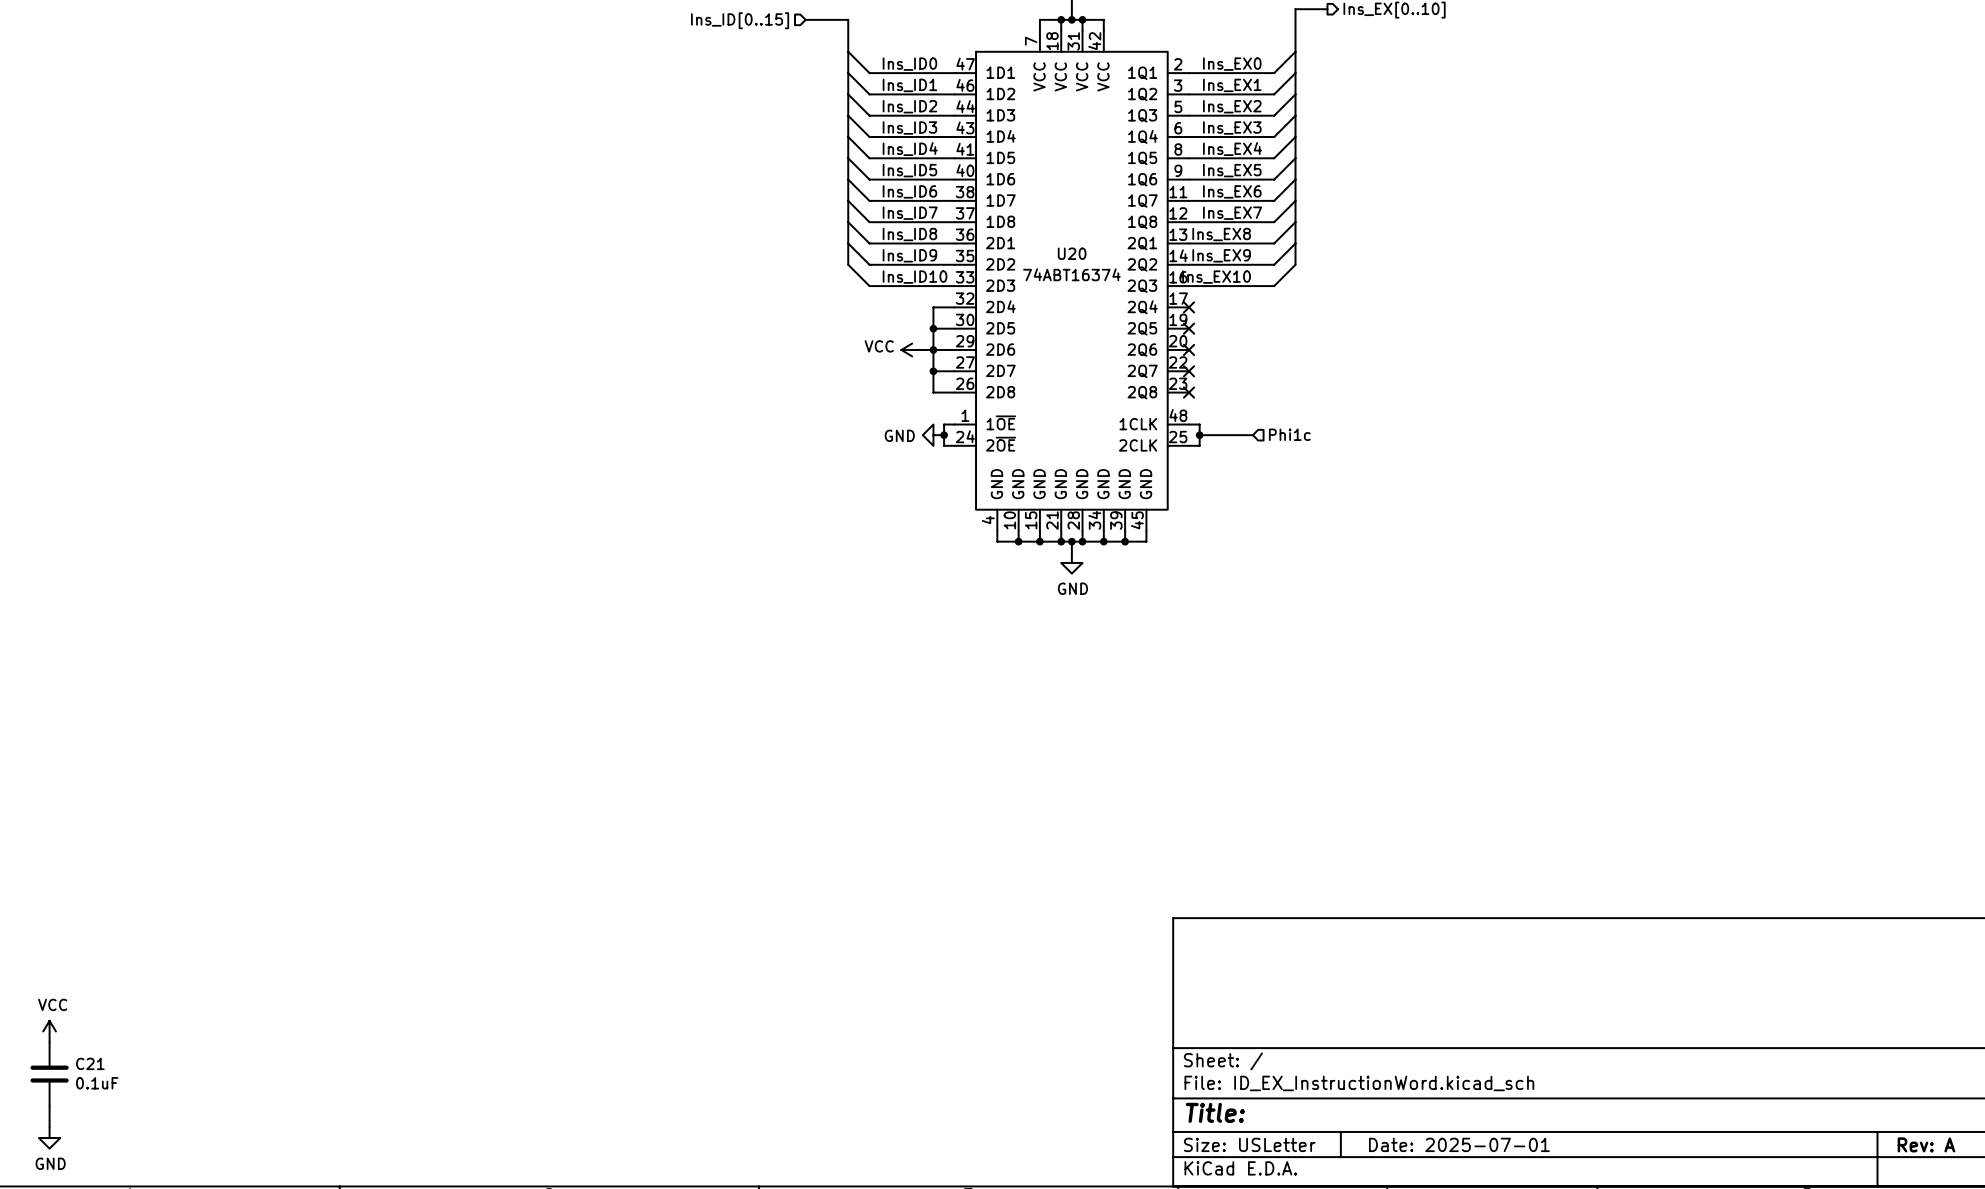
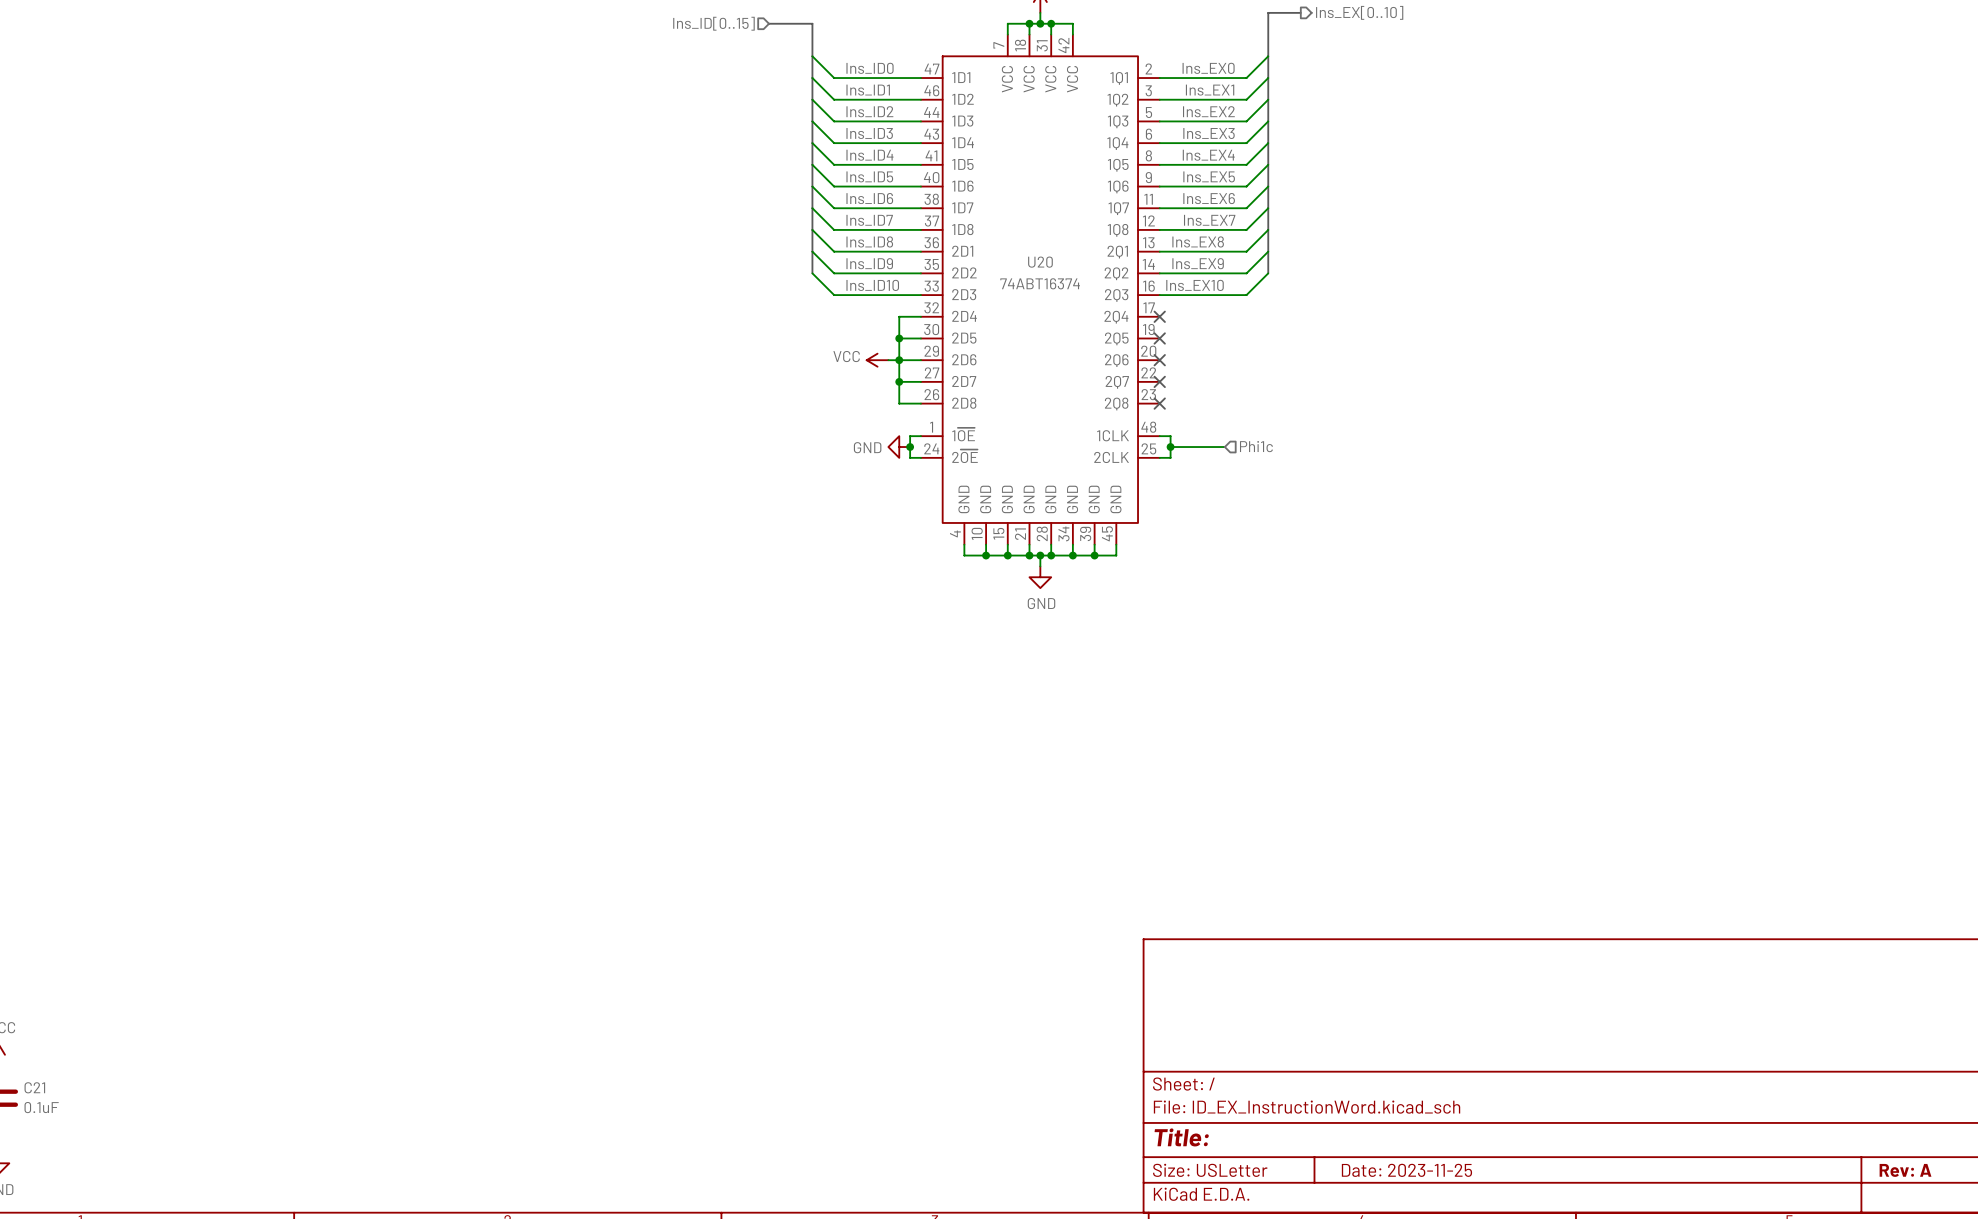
title block: Date: 2025-07-01 (1459, 1144) -> Date: 2023-11-25 (1406, 1170)

